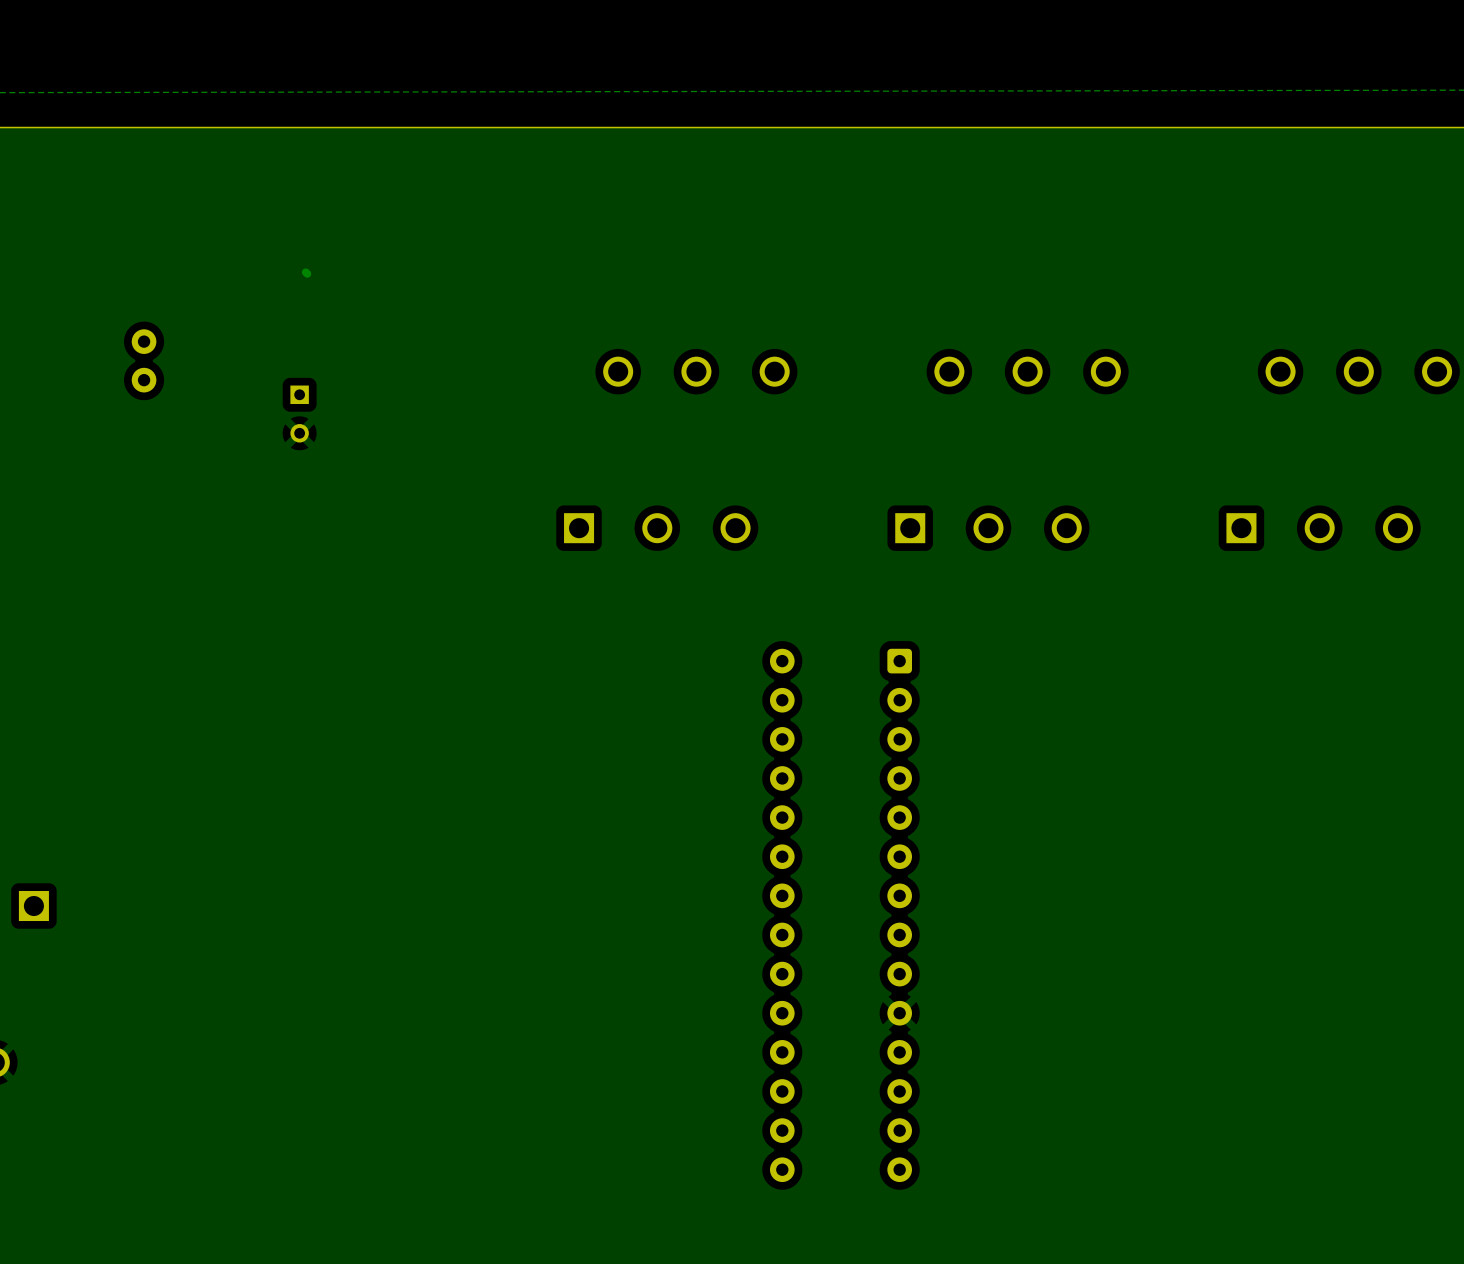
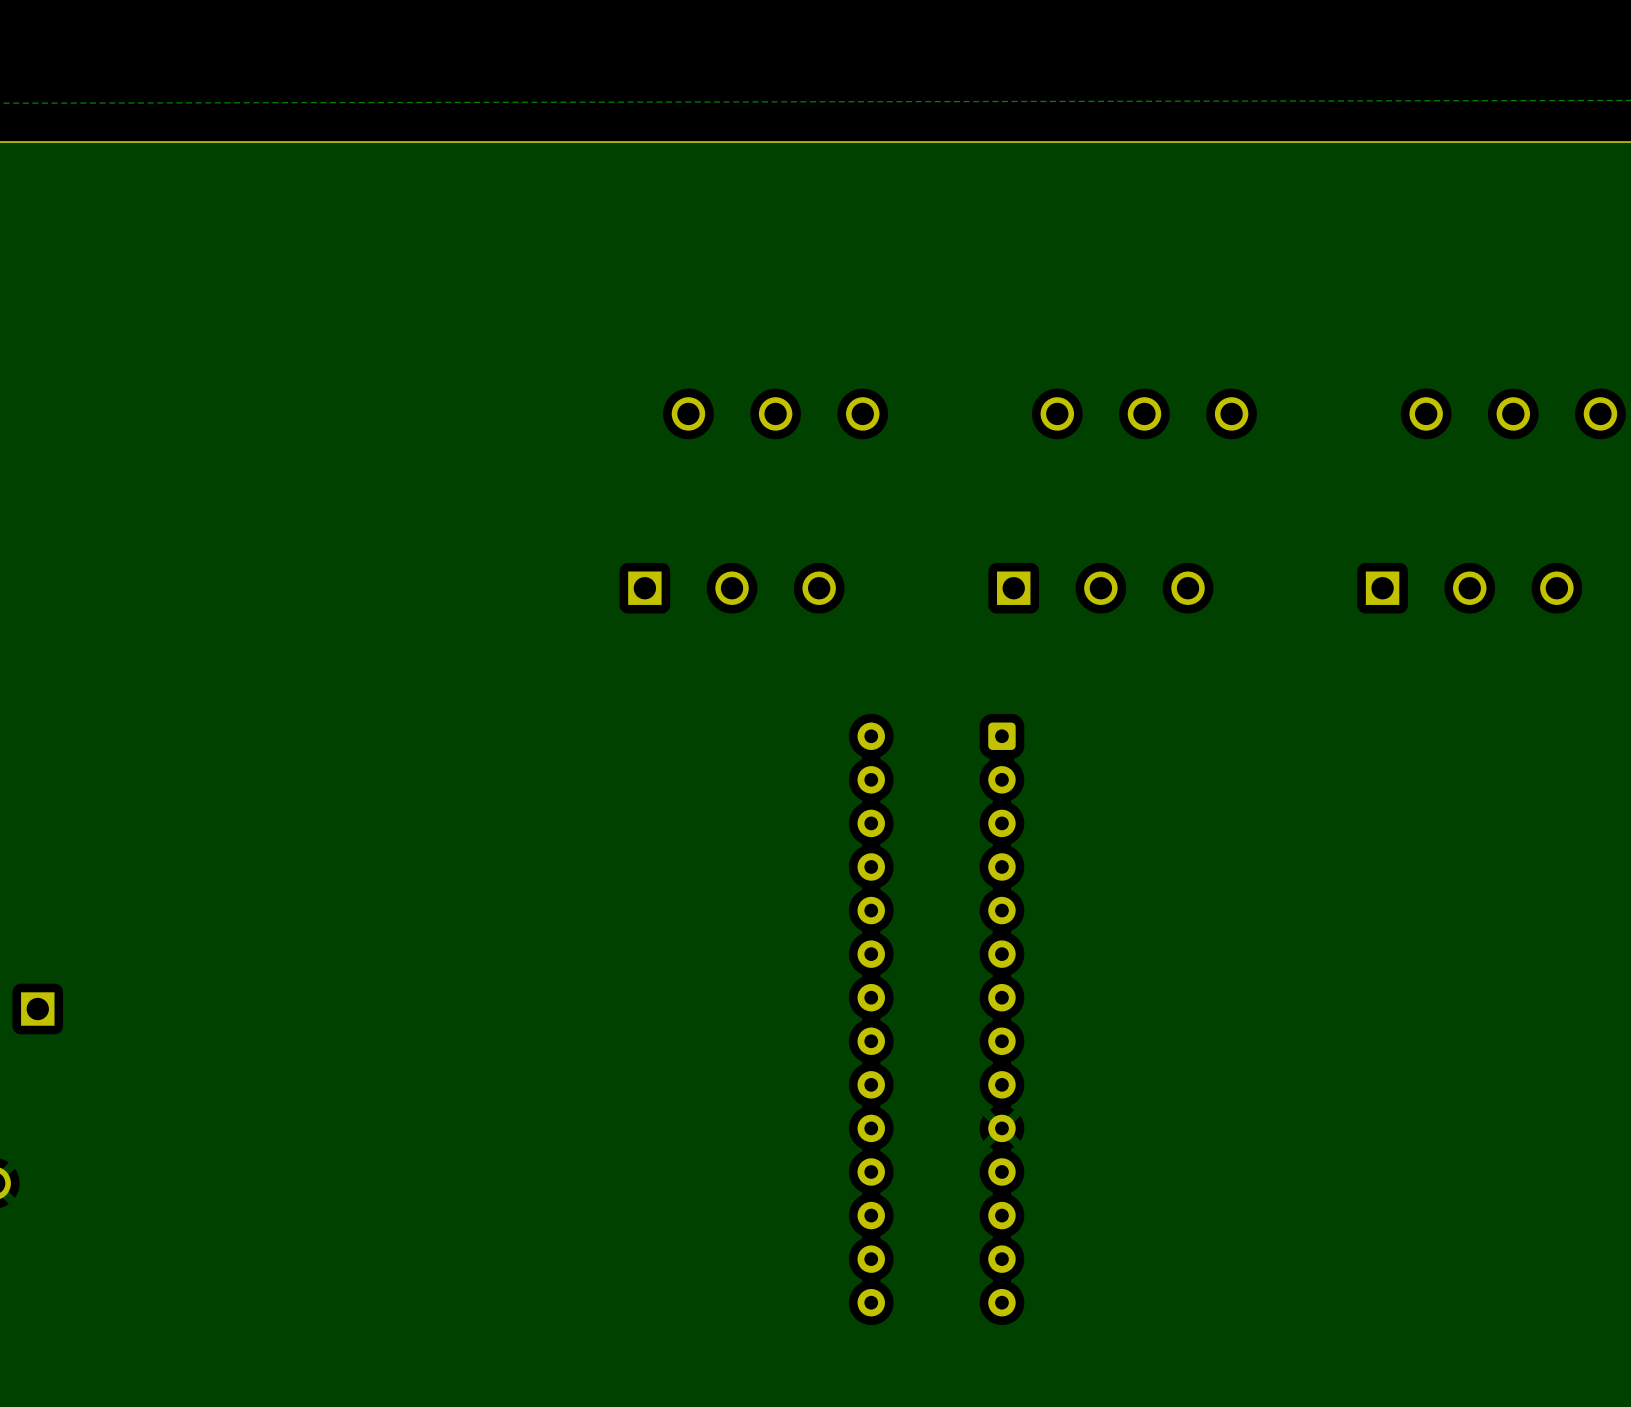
track: (305, 272) (307, 273) -> none
part: (144, 360) -> none
part: (299, 414) -> none

